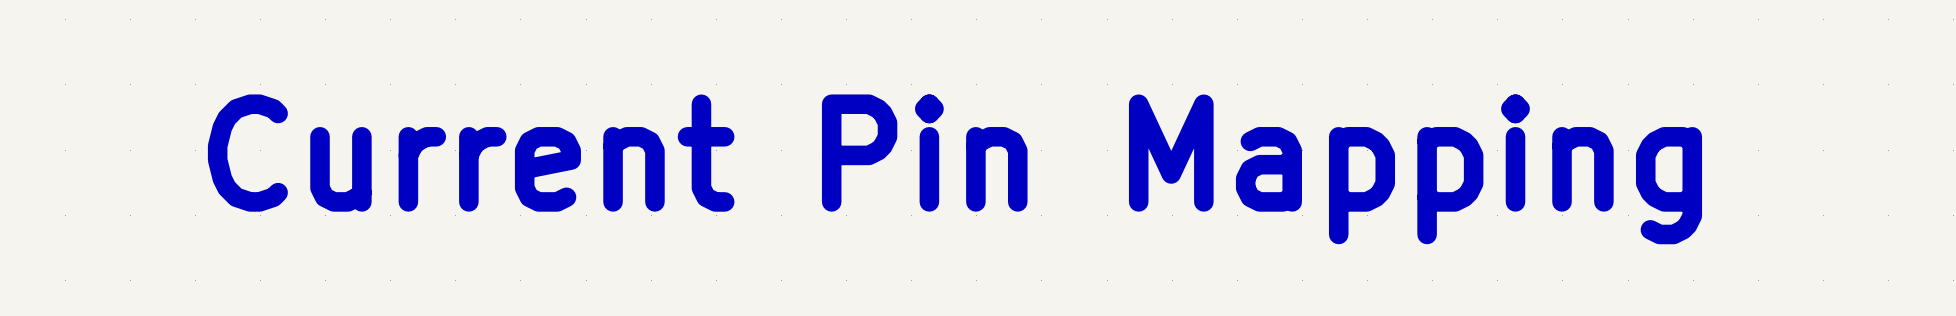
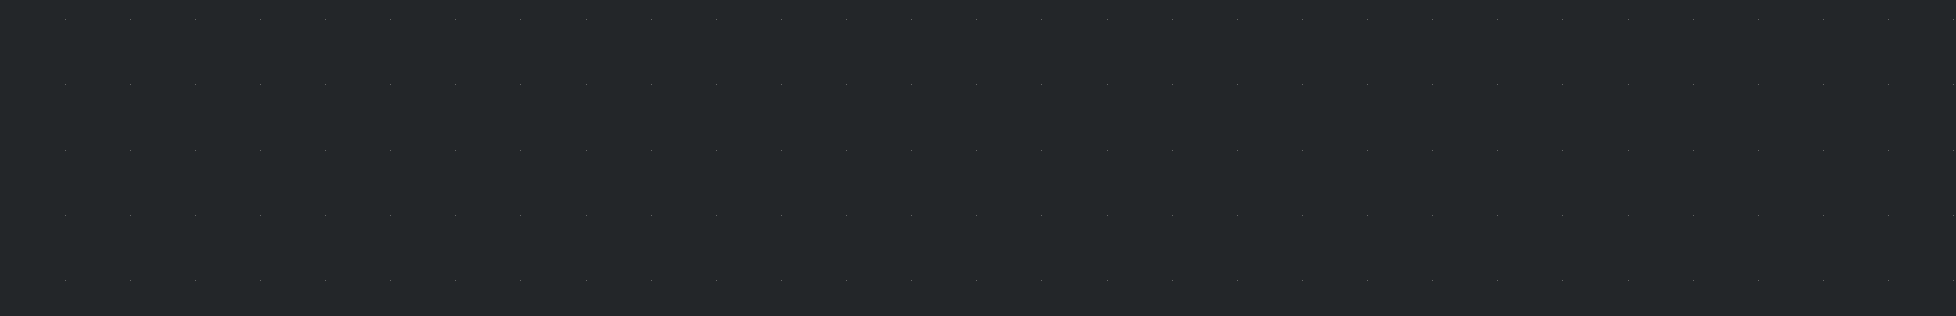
text: Current Pin Mapping (954, 169) -> none

